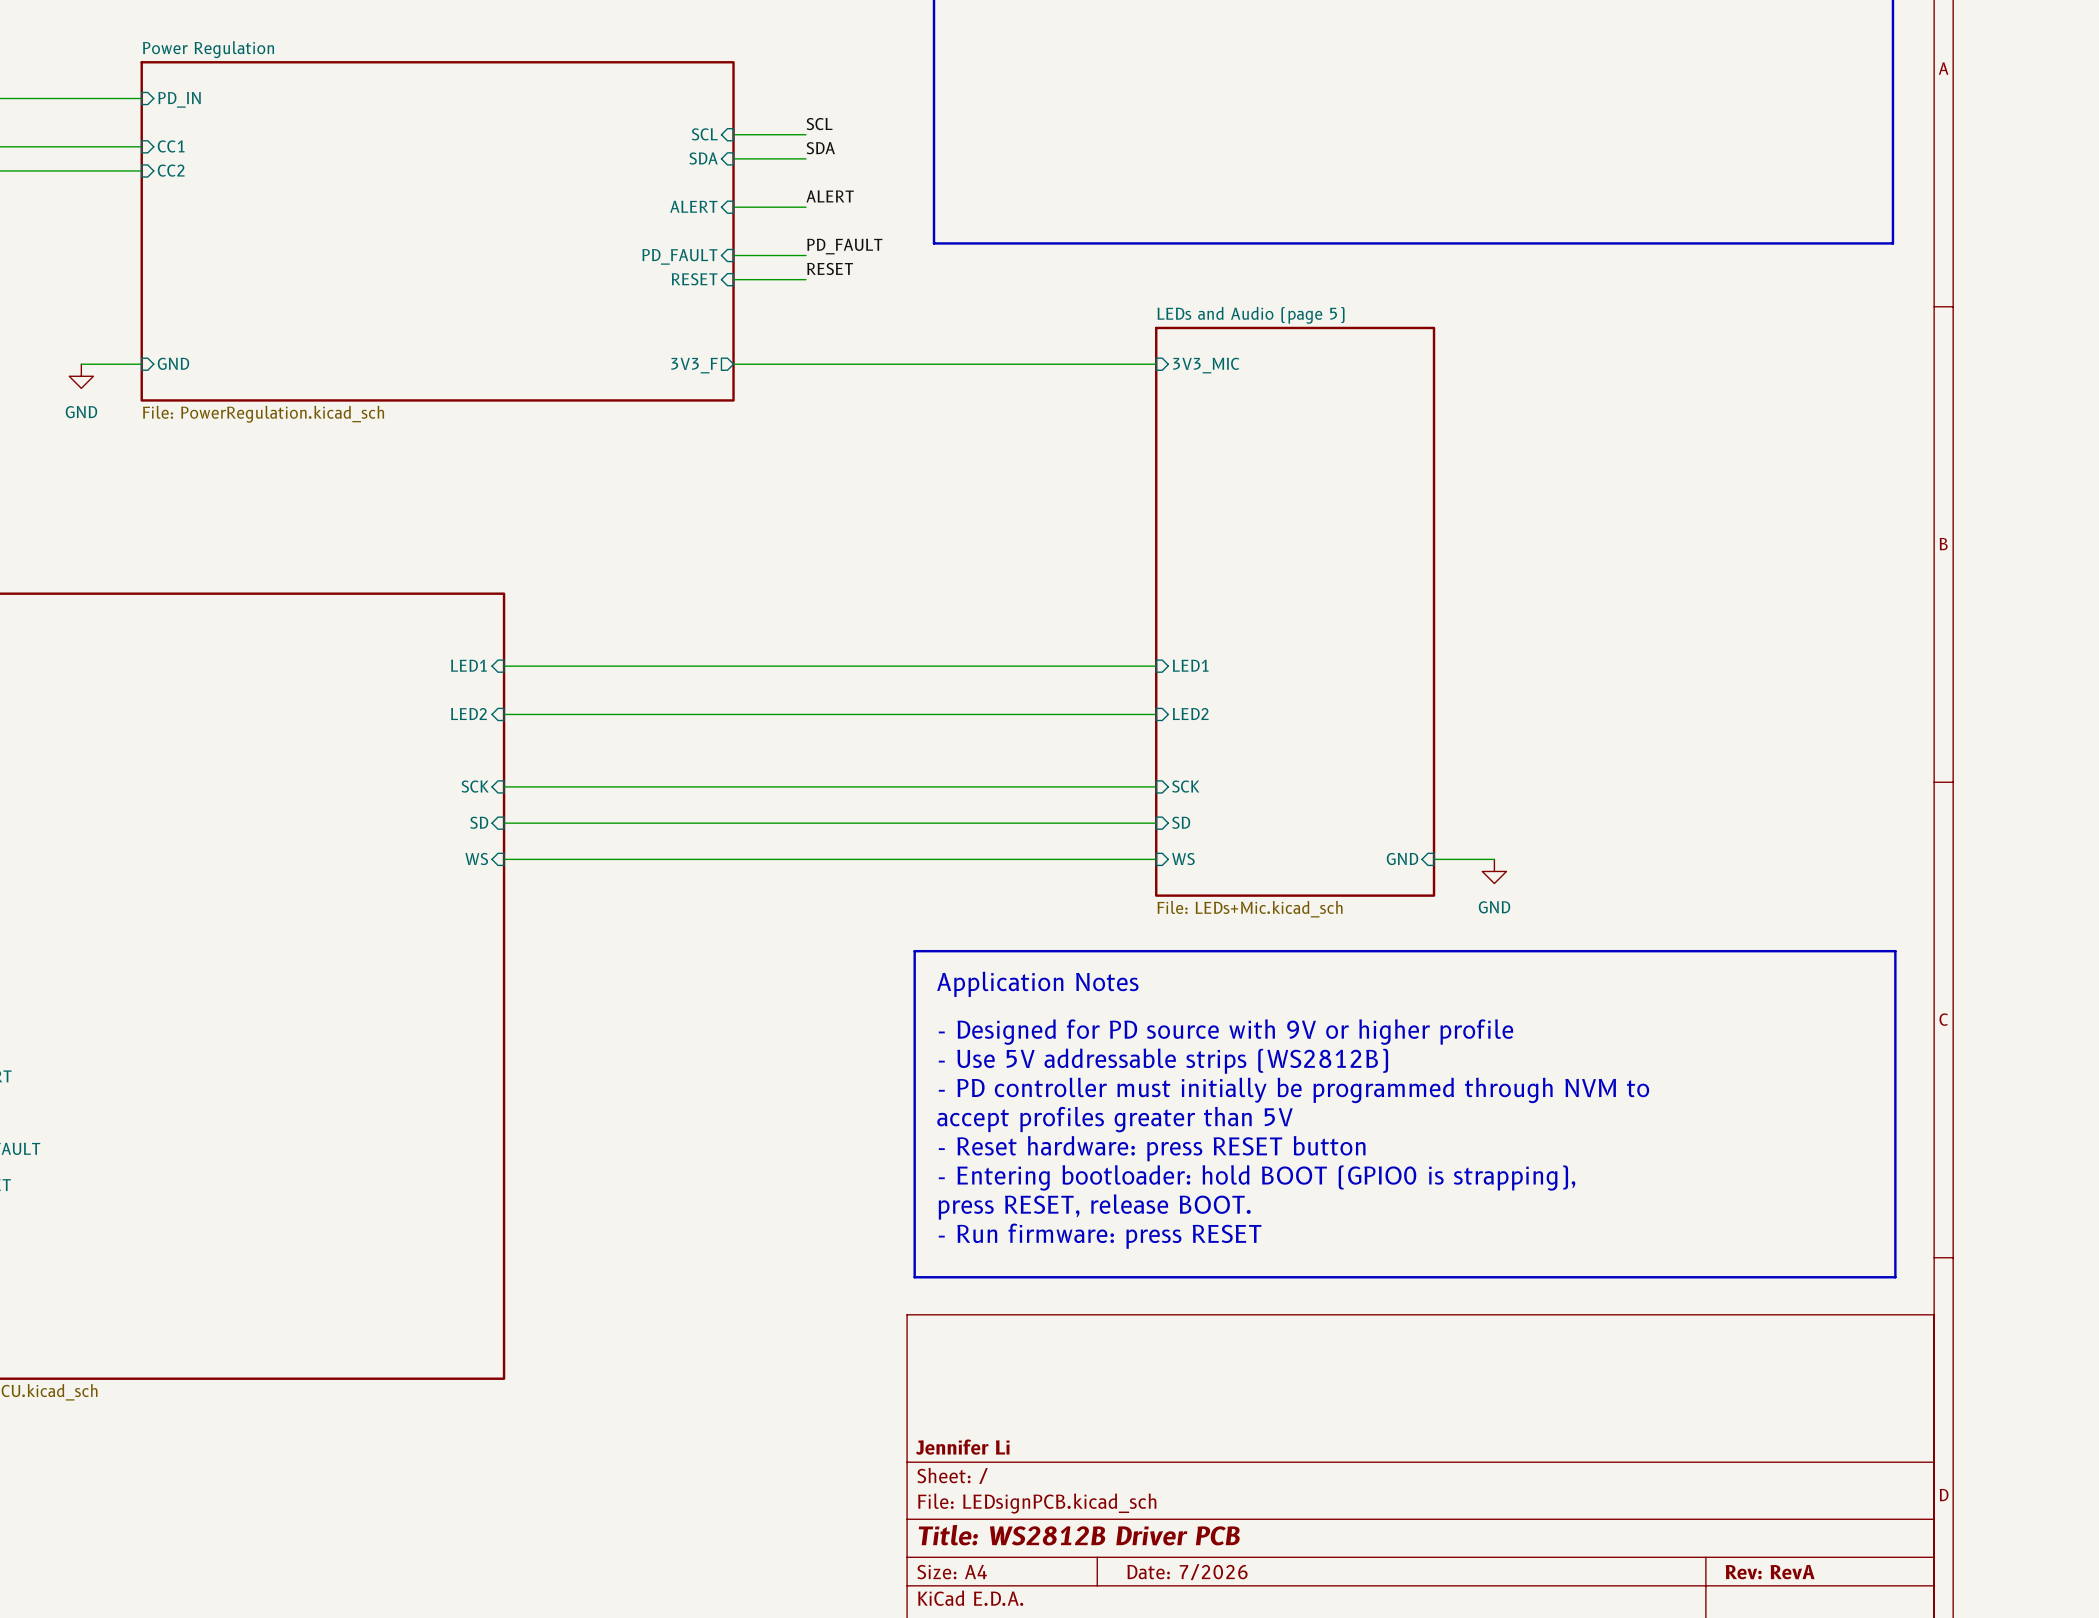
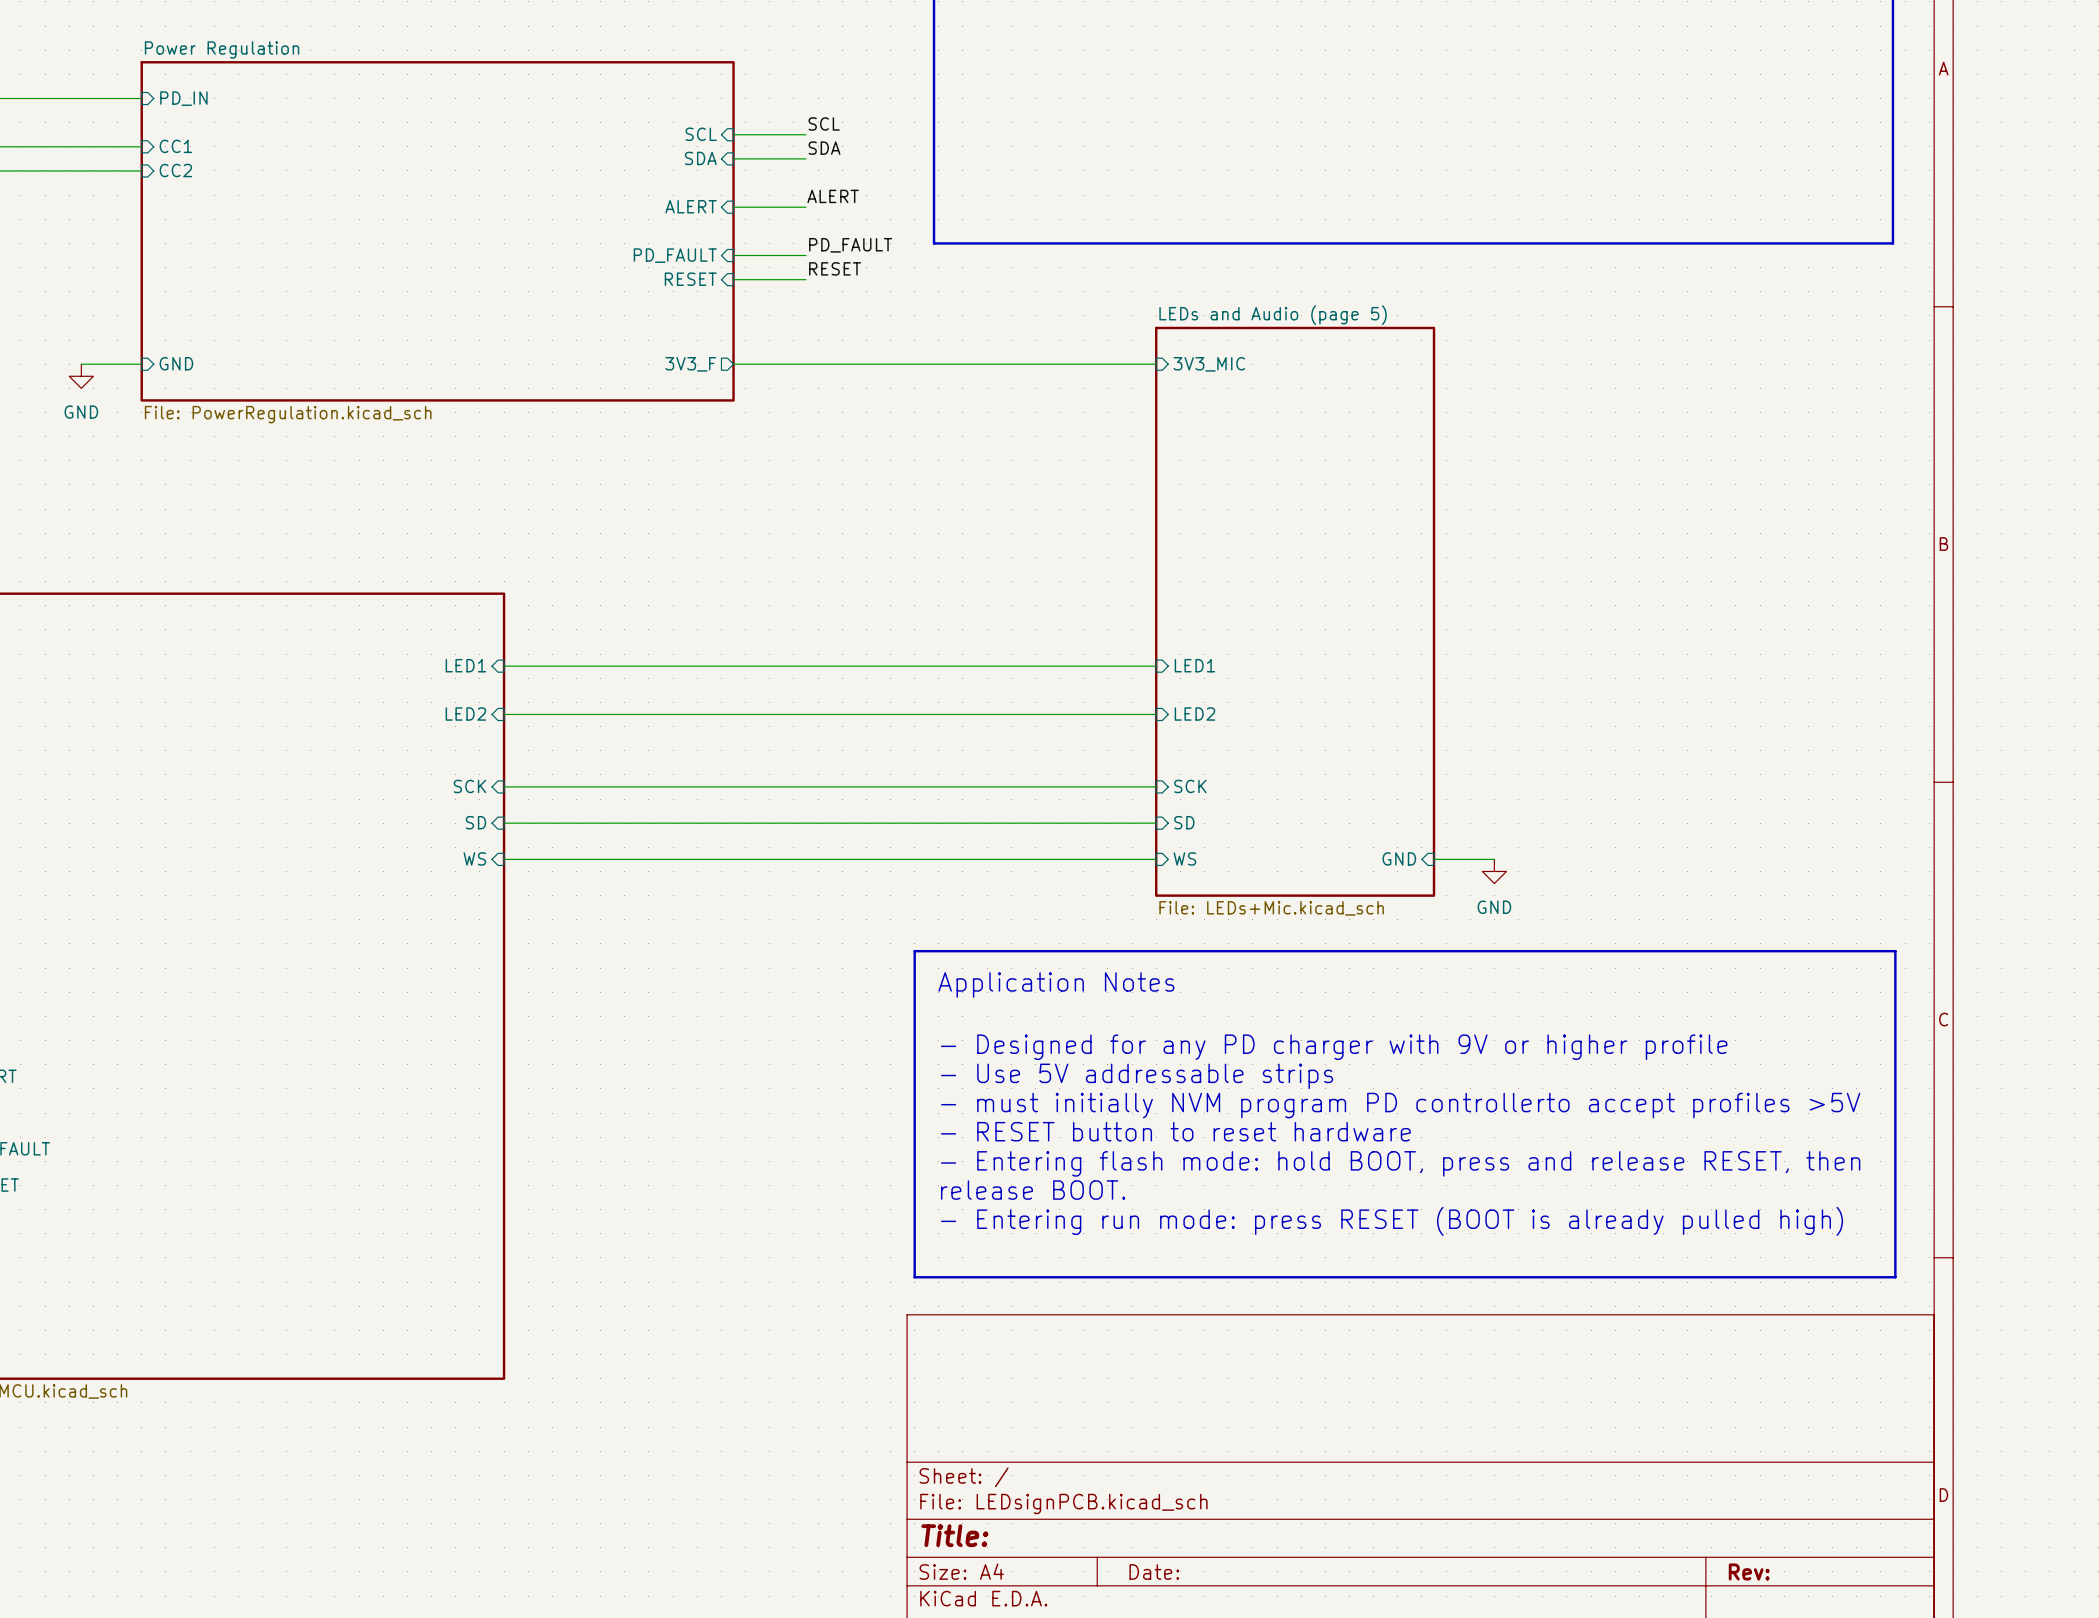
text: - Designed for PD source with 9V or higher profile (1225, 1032) -> - Designed for any PD charger with 9V or higher profile (1334, 1047)
text: - Use 5V addressable strips (WS2812B) (1163, 1061) -> - Use 5V addressable strips (1137, 1076)
text: - PD controller must initially be programmed through NVM to (1293, 1090) -> none
text: none -> - must initially NVM program PD controllerto accept profiles >5V (1400, 1105)
text: accept profiles greater than 5V (1114, 1119) -> none
text: none -> - RESET button to reset hardware (1175, 1131)
text: - Reset hardware: press RESET button (1152, 1148) -> none
text: none -> - Entering flash mode: hold BOOT, press and release RESET, then (1400, 1163)
text: - Entering bootloader: hold BOOT (GPIO0 is strapping), (1257, 1177) -> none
text: press RESET, release BOOT. (1094, 1207) -> release BOOT. (1033, 1190)
text: none -> - Entering run mode: press RESET (BOOT is already pulled high) (1392, 1221)
text: - Run firmware: press RESET (1100, 1236) -> none
title block: Jennifer Li (962, 1447) -> none
title block: Title: WS2812B Driver PCB (1079, 1535) -> Title: (954, 1535)
title block: Date: 7/2026 (1187, 1572) -> Date: (1154, 1571)
title block: Rev: RevA (1770, 1572) -> Rev: (1749, 1571)

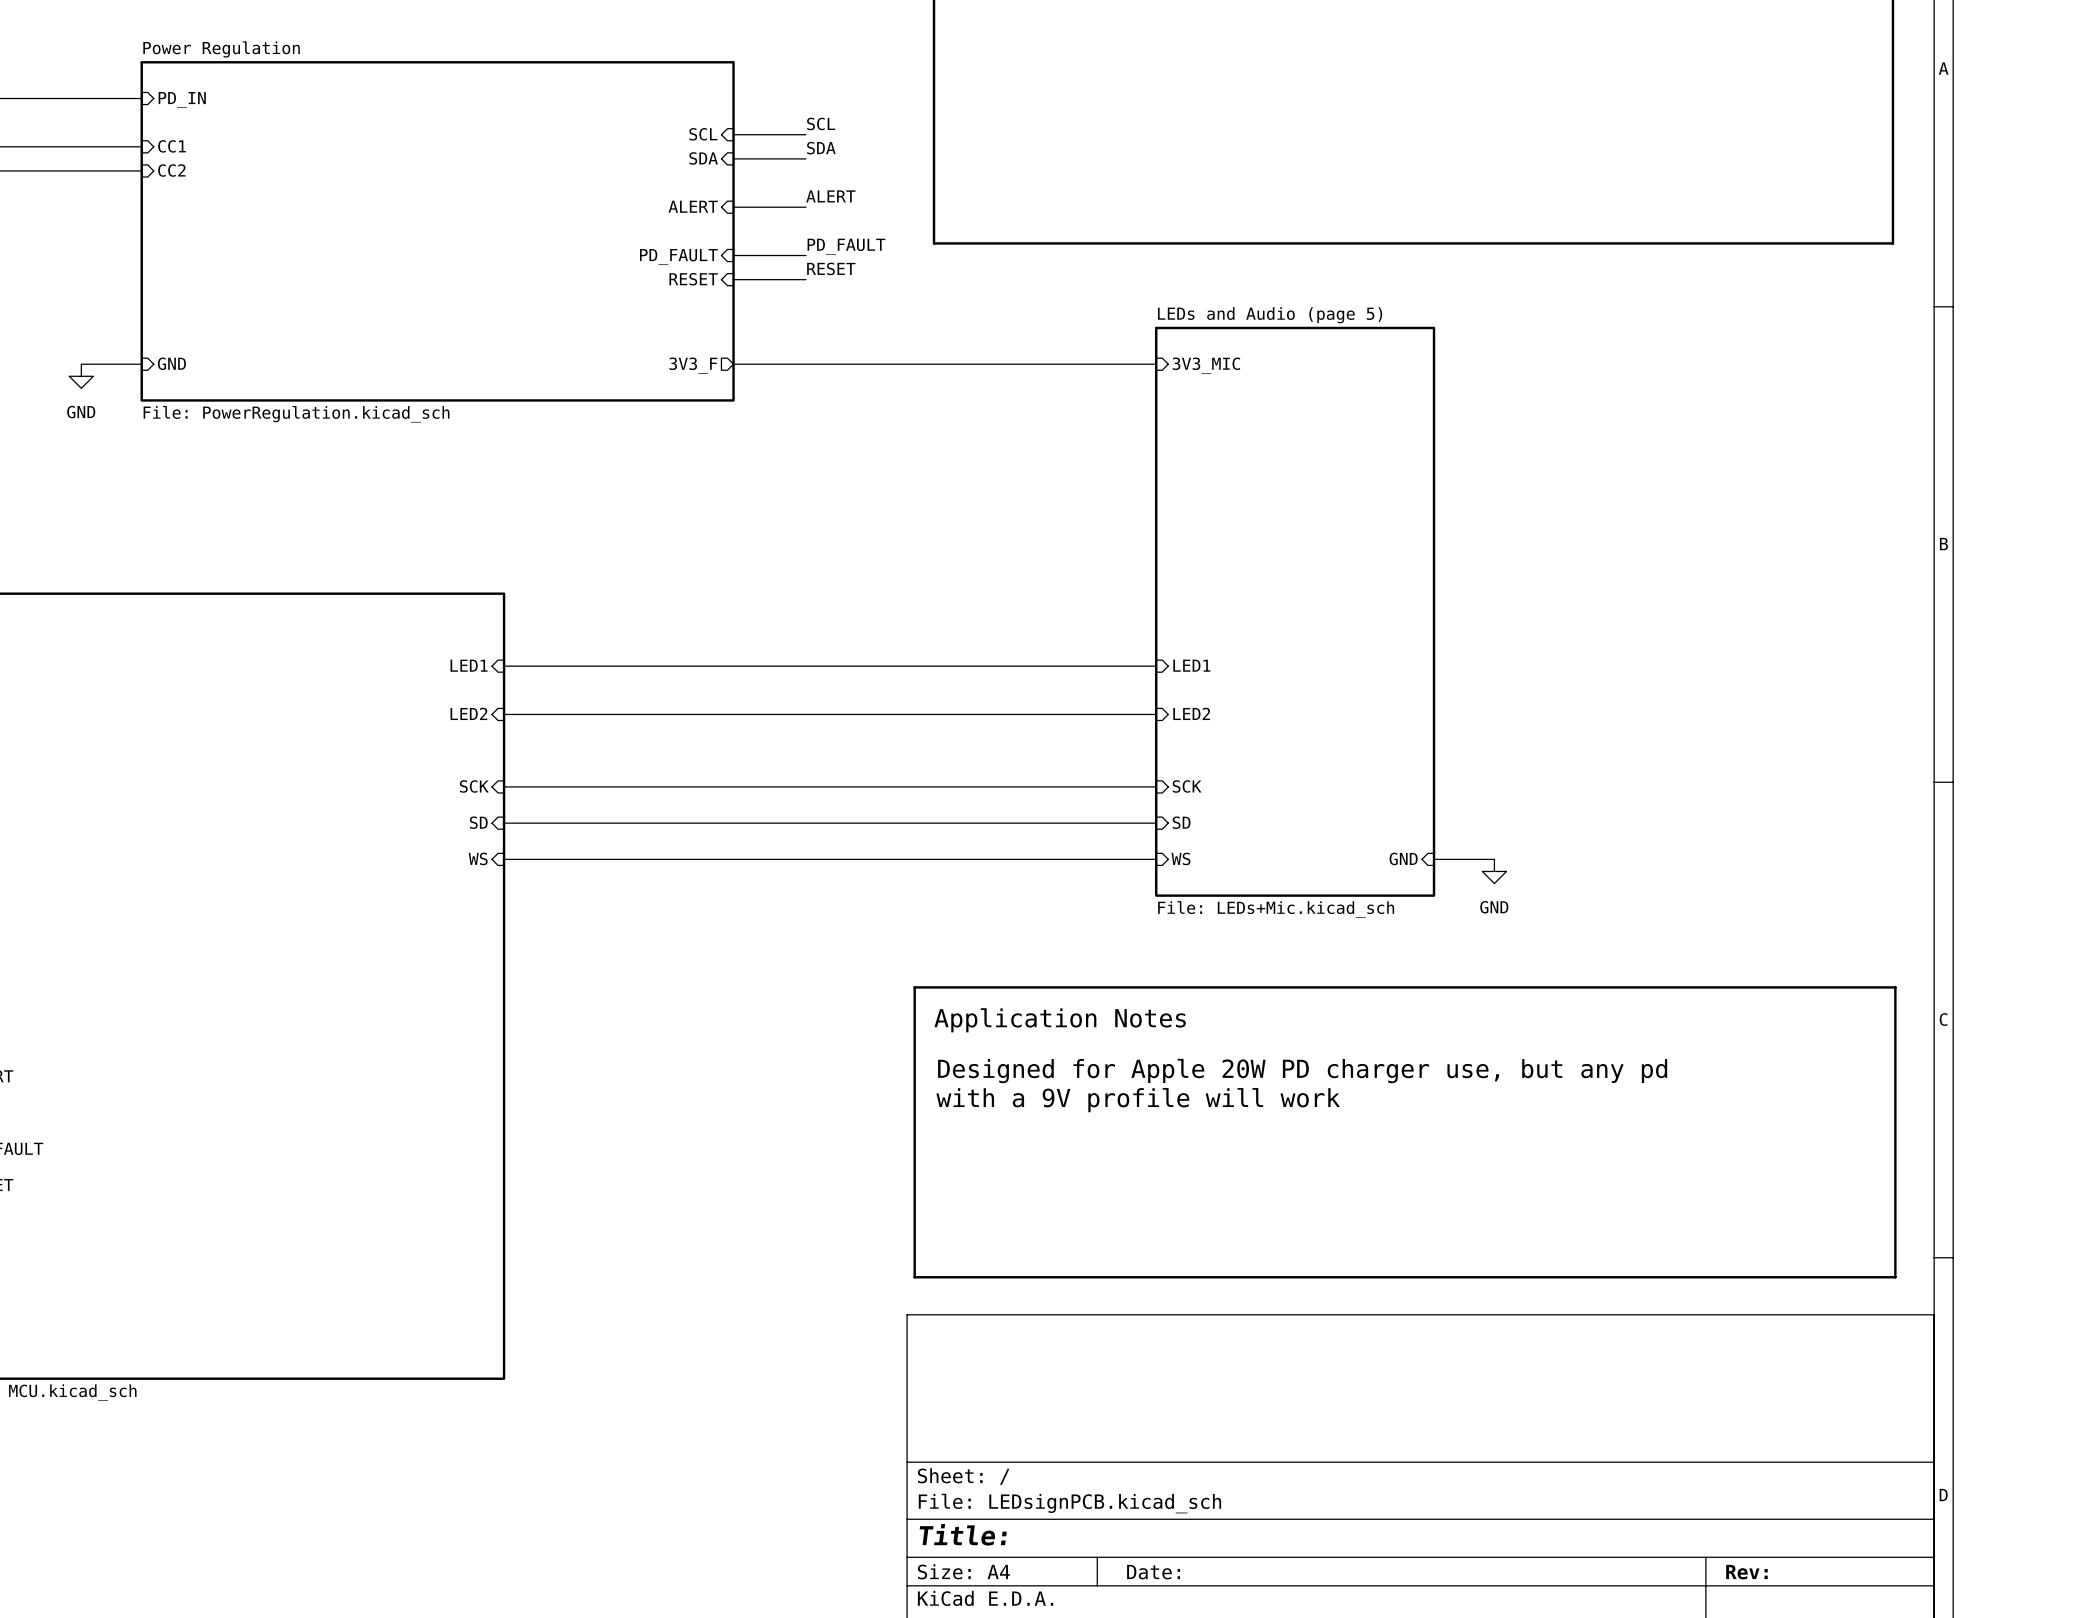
text position: Application Notes (1056, 984) -> Application Notes (1060, 1020)
line: (914, 987) (914, 951) (1895, 951) (1895, 987) -> (914, 987) (1895, 987)
text: - Designed for any PD charger with 9V or higher profile (1334, 1047) -> none
text: - Use 5V addressable strips (1137, 1076) -> Designed for Apple 20W PD charger use, but any pd (1302, 1071)
text: - must initially NVM program PD controllerto accept profiles >5V (1400, 1105) -> with a 9V profile will work (1138, 1100)
text: - RESET button to reset hardware (1175, 1131) -> none
text: - Entering flash mode: hold BOOT, press and release RESET, then (1400, 1163) -> none
text: release BOOT. (1033, 1190) -> none
text: - Entering run mode: press RESET (BOOT is already pulled high) (1392, 1221) -> none

